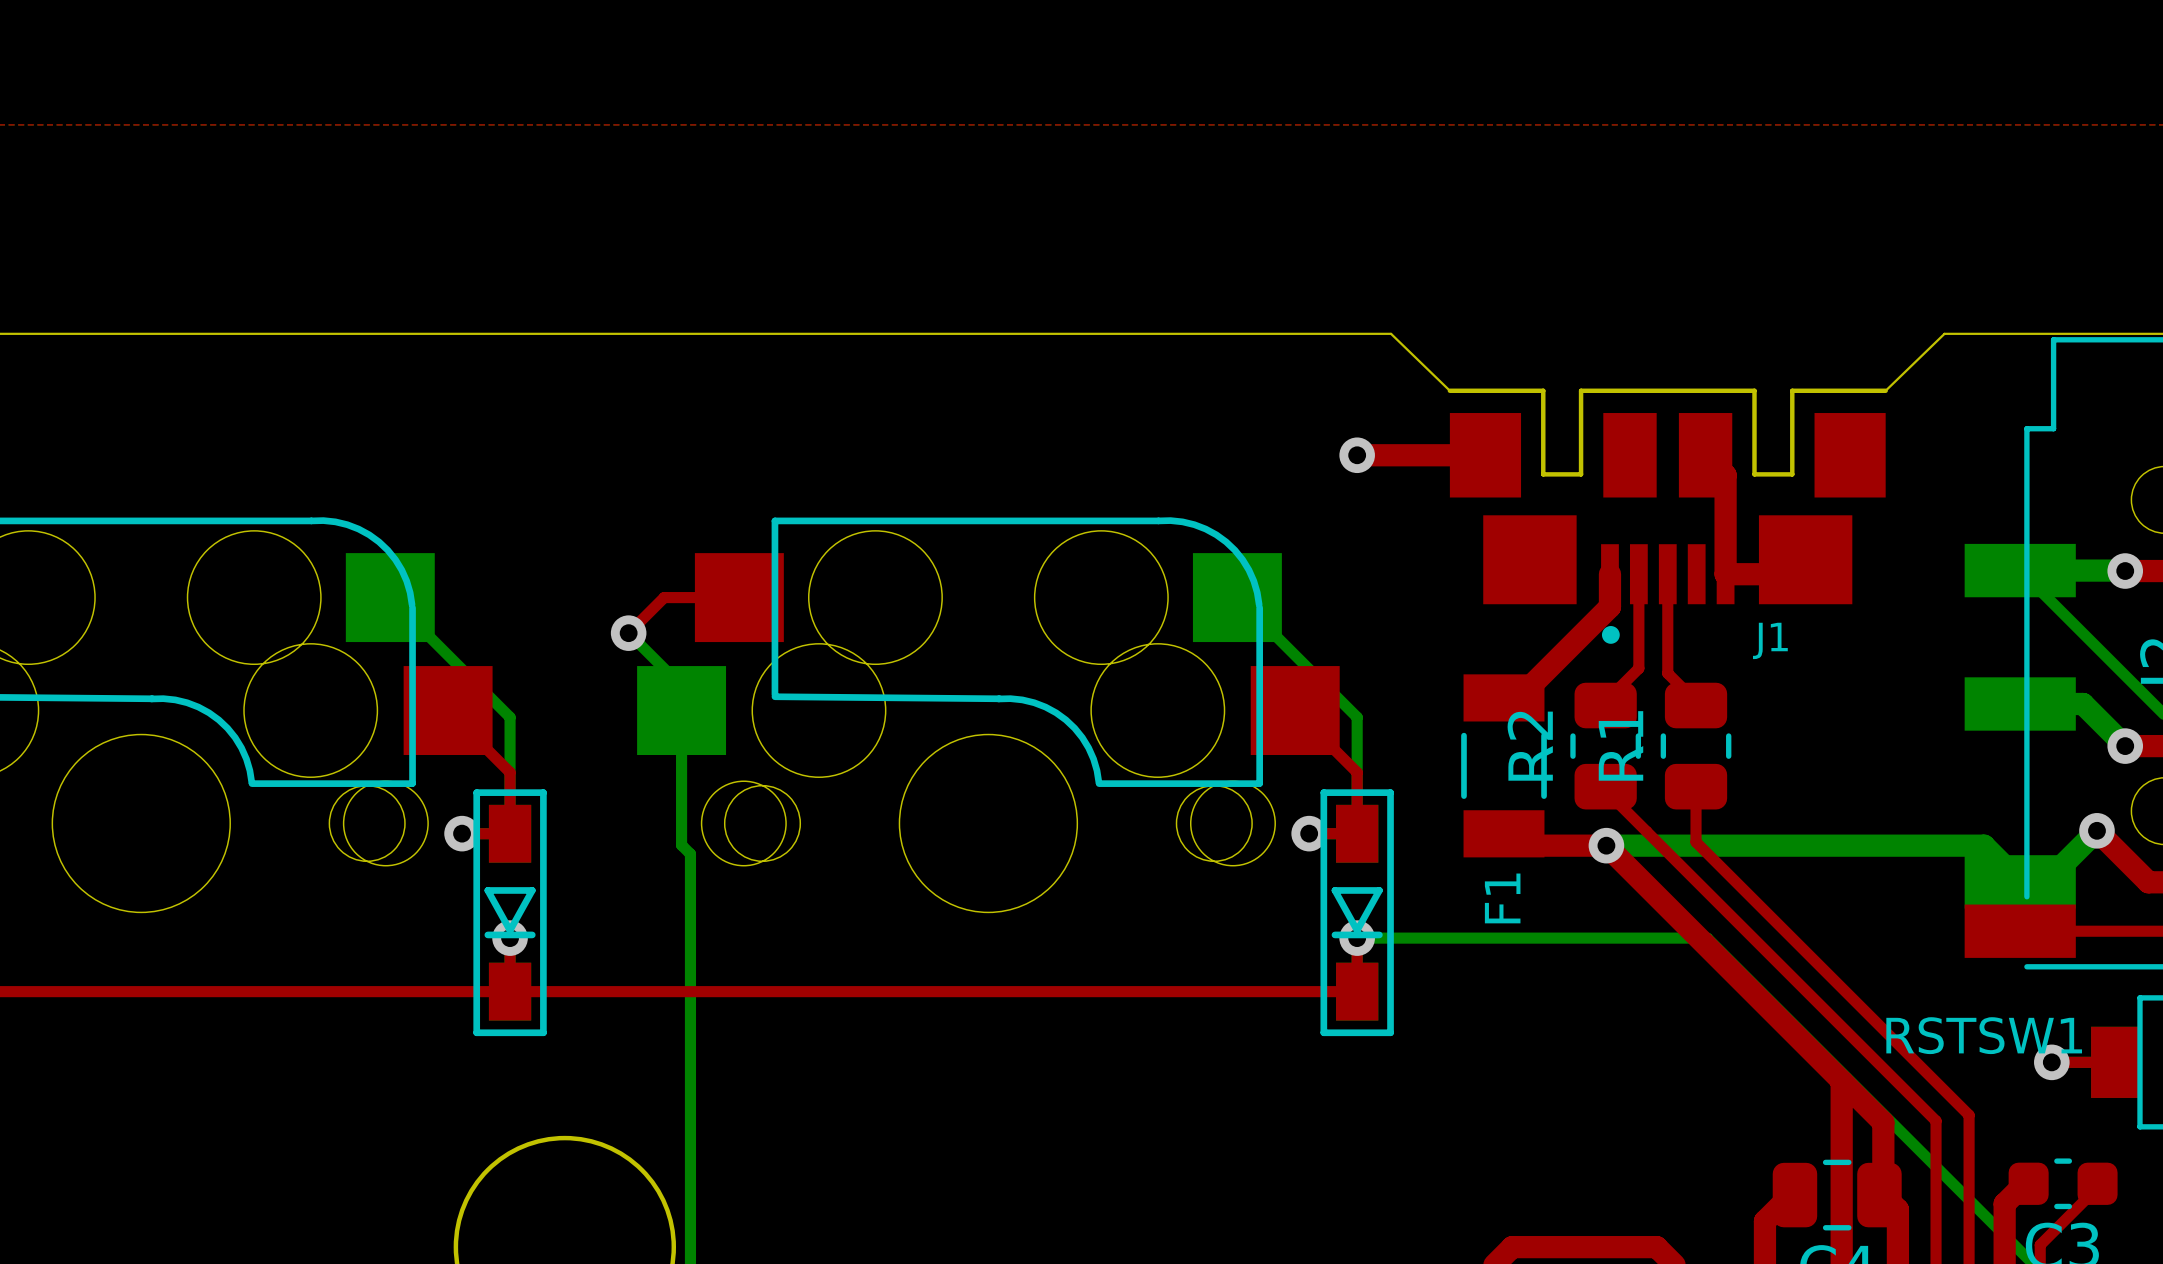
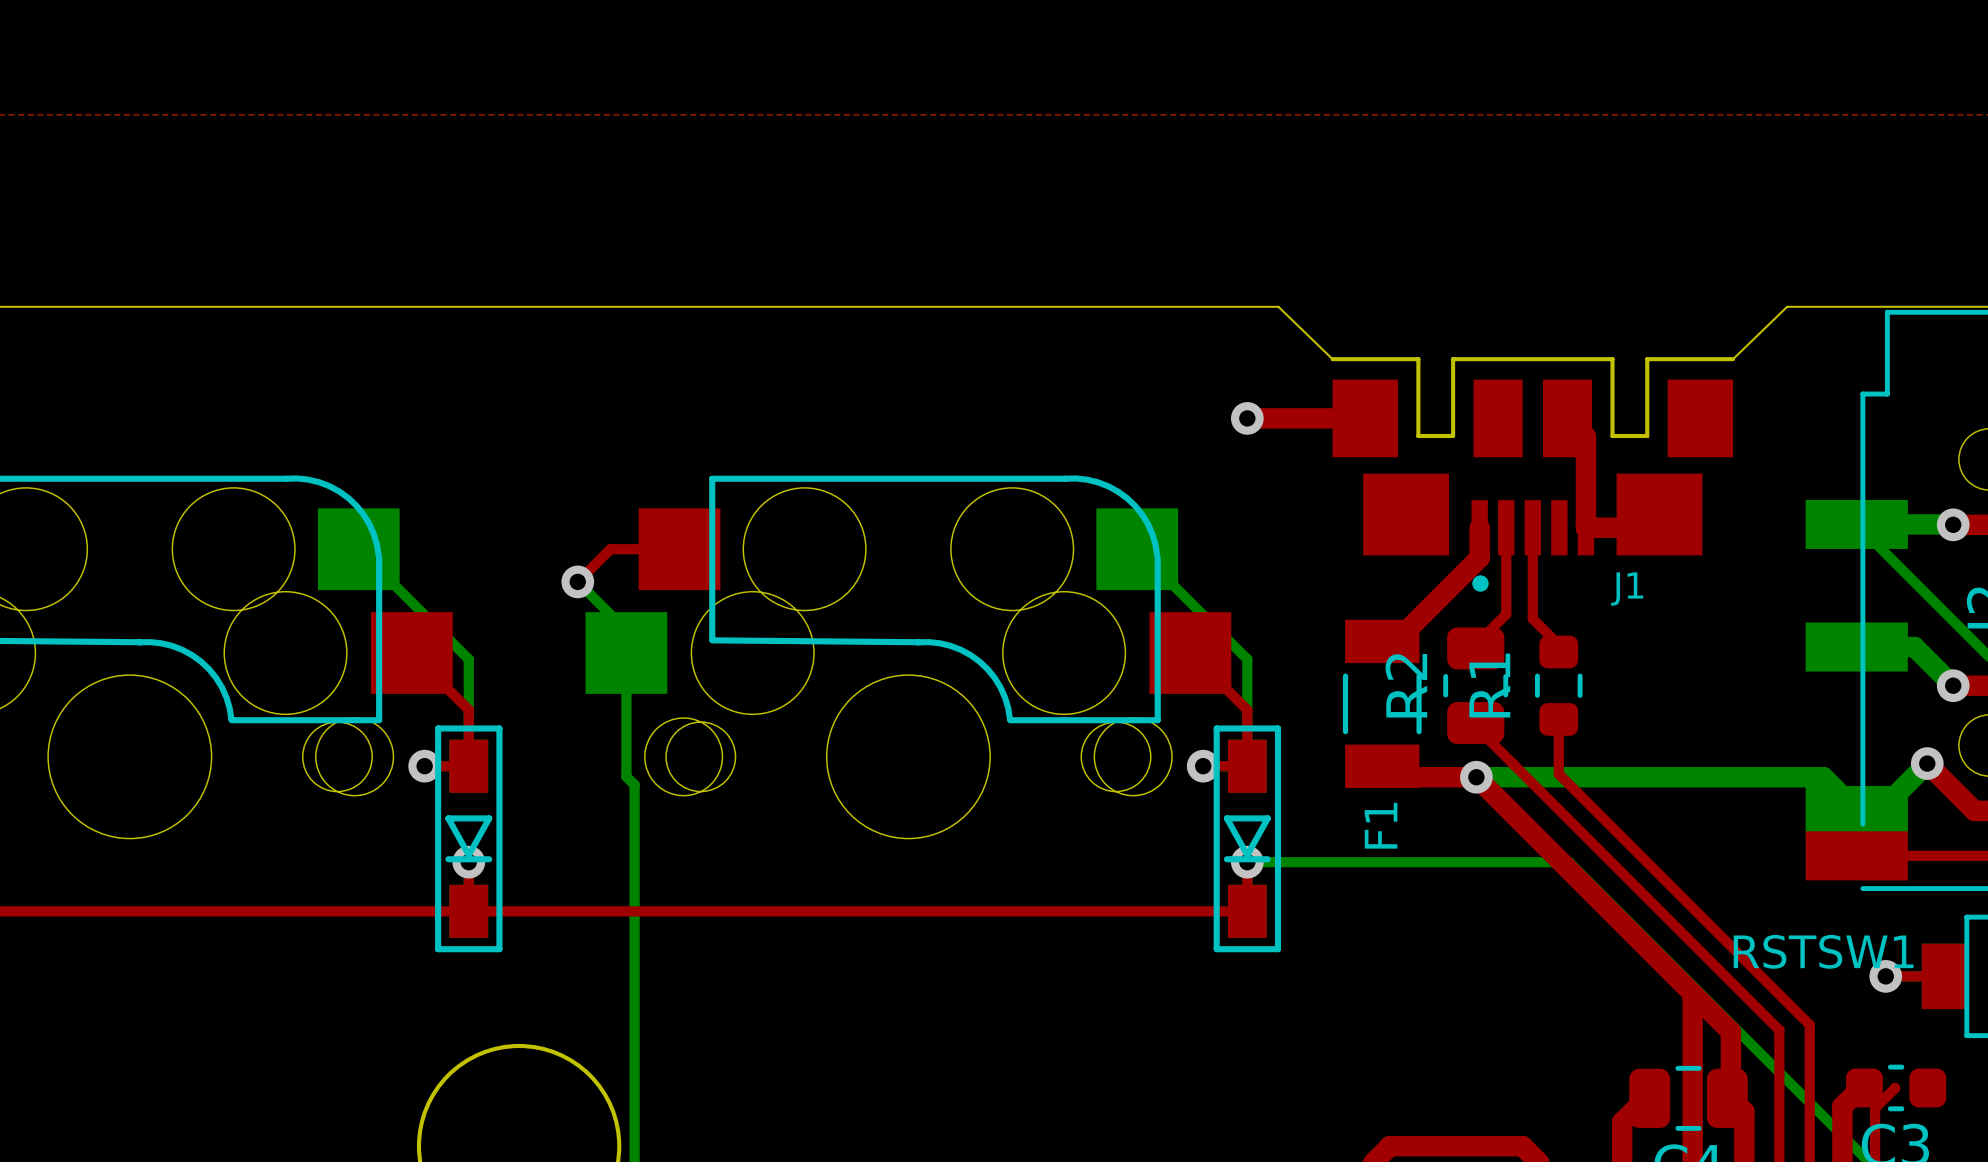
R1 footprint: [1660, 682, 1732, 810] -> [1534, 635, 1583, 736]
top track: (2101, 1183) (2040, 1245) -> (1894, 1088) (1875, 1108) (1875, 1144)

